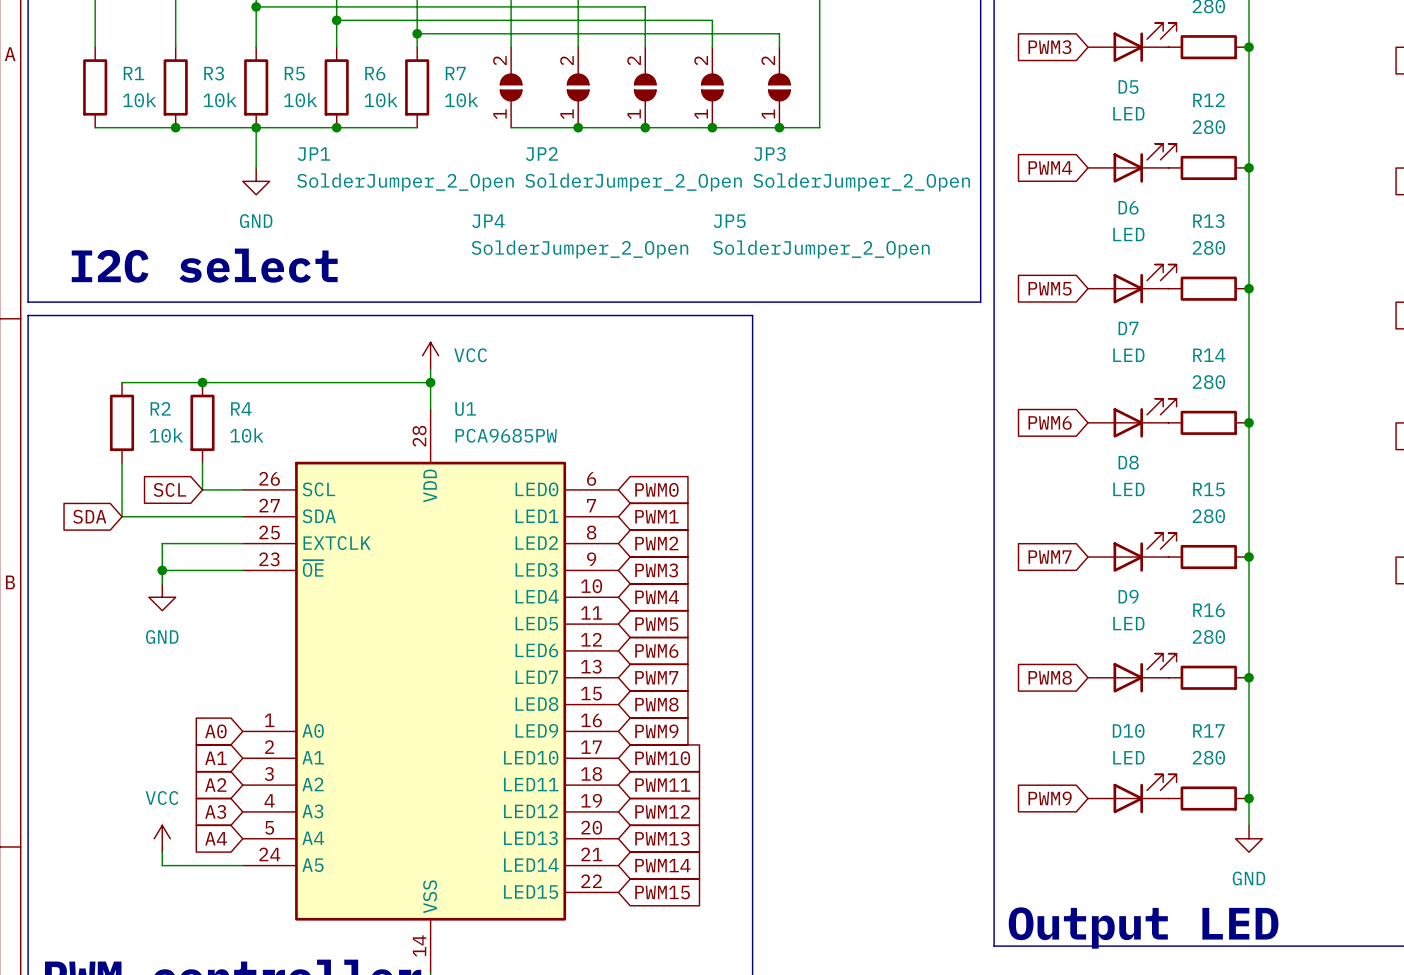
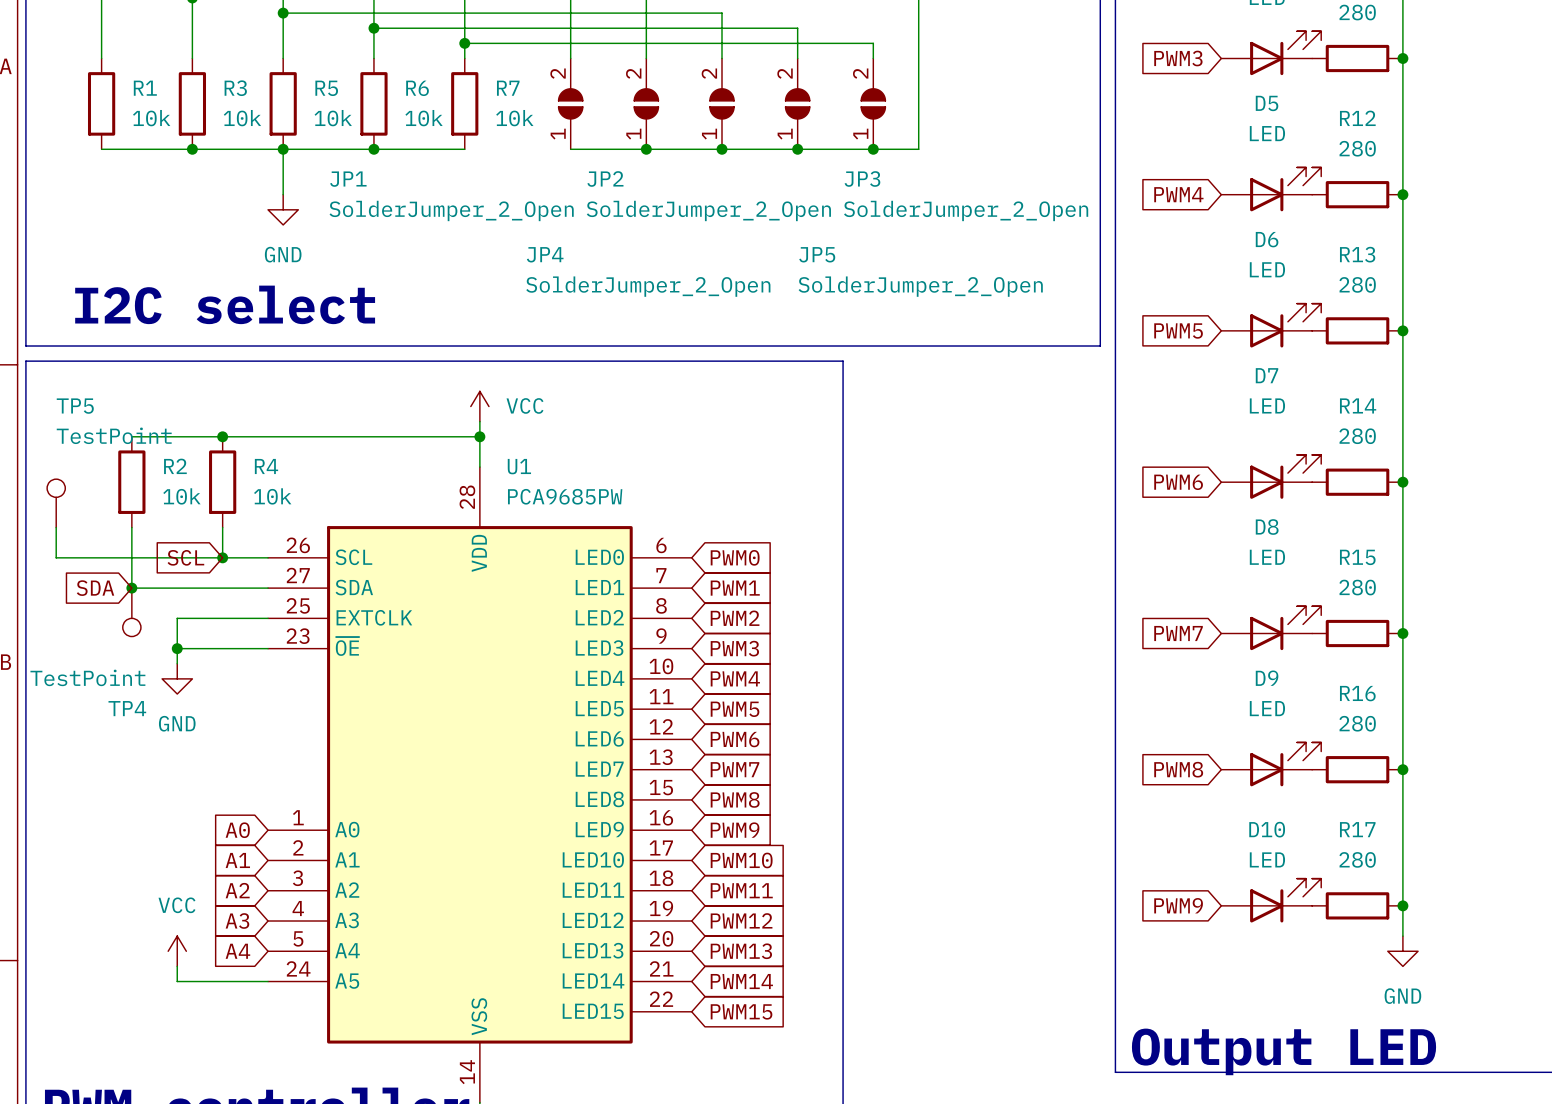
TP5: none -> TestPoint (56, 503)
wire: none -> (56, 527) (56, 557) (222, 557)
junction: none -> (222, 557)
junction: none -> (131, 588)
TP4: none -> TestPoint (131, 612)

